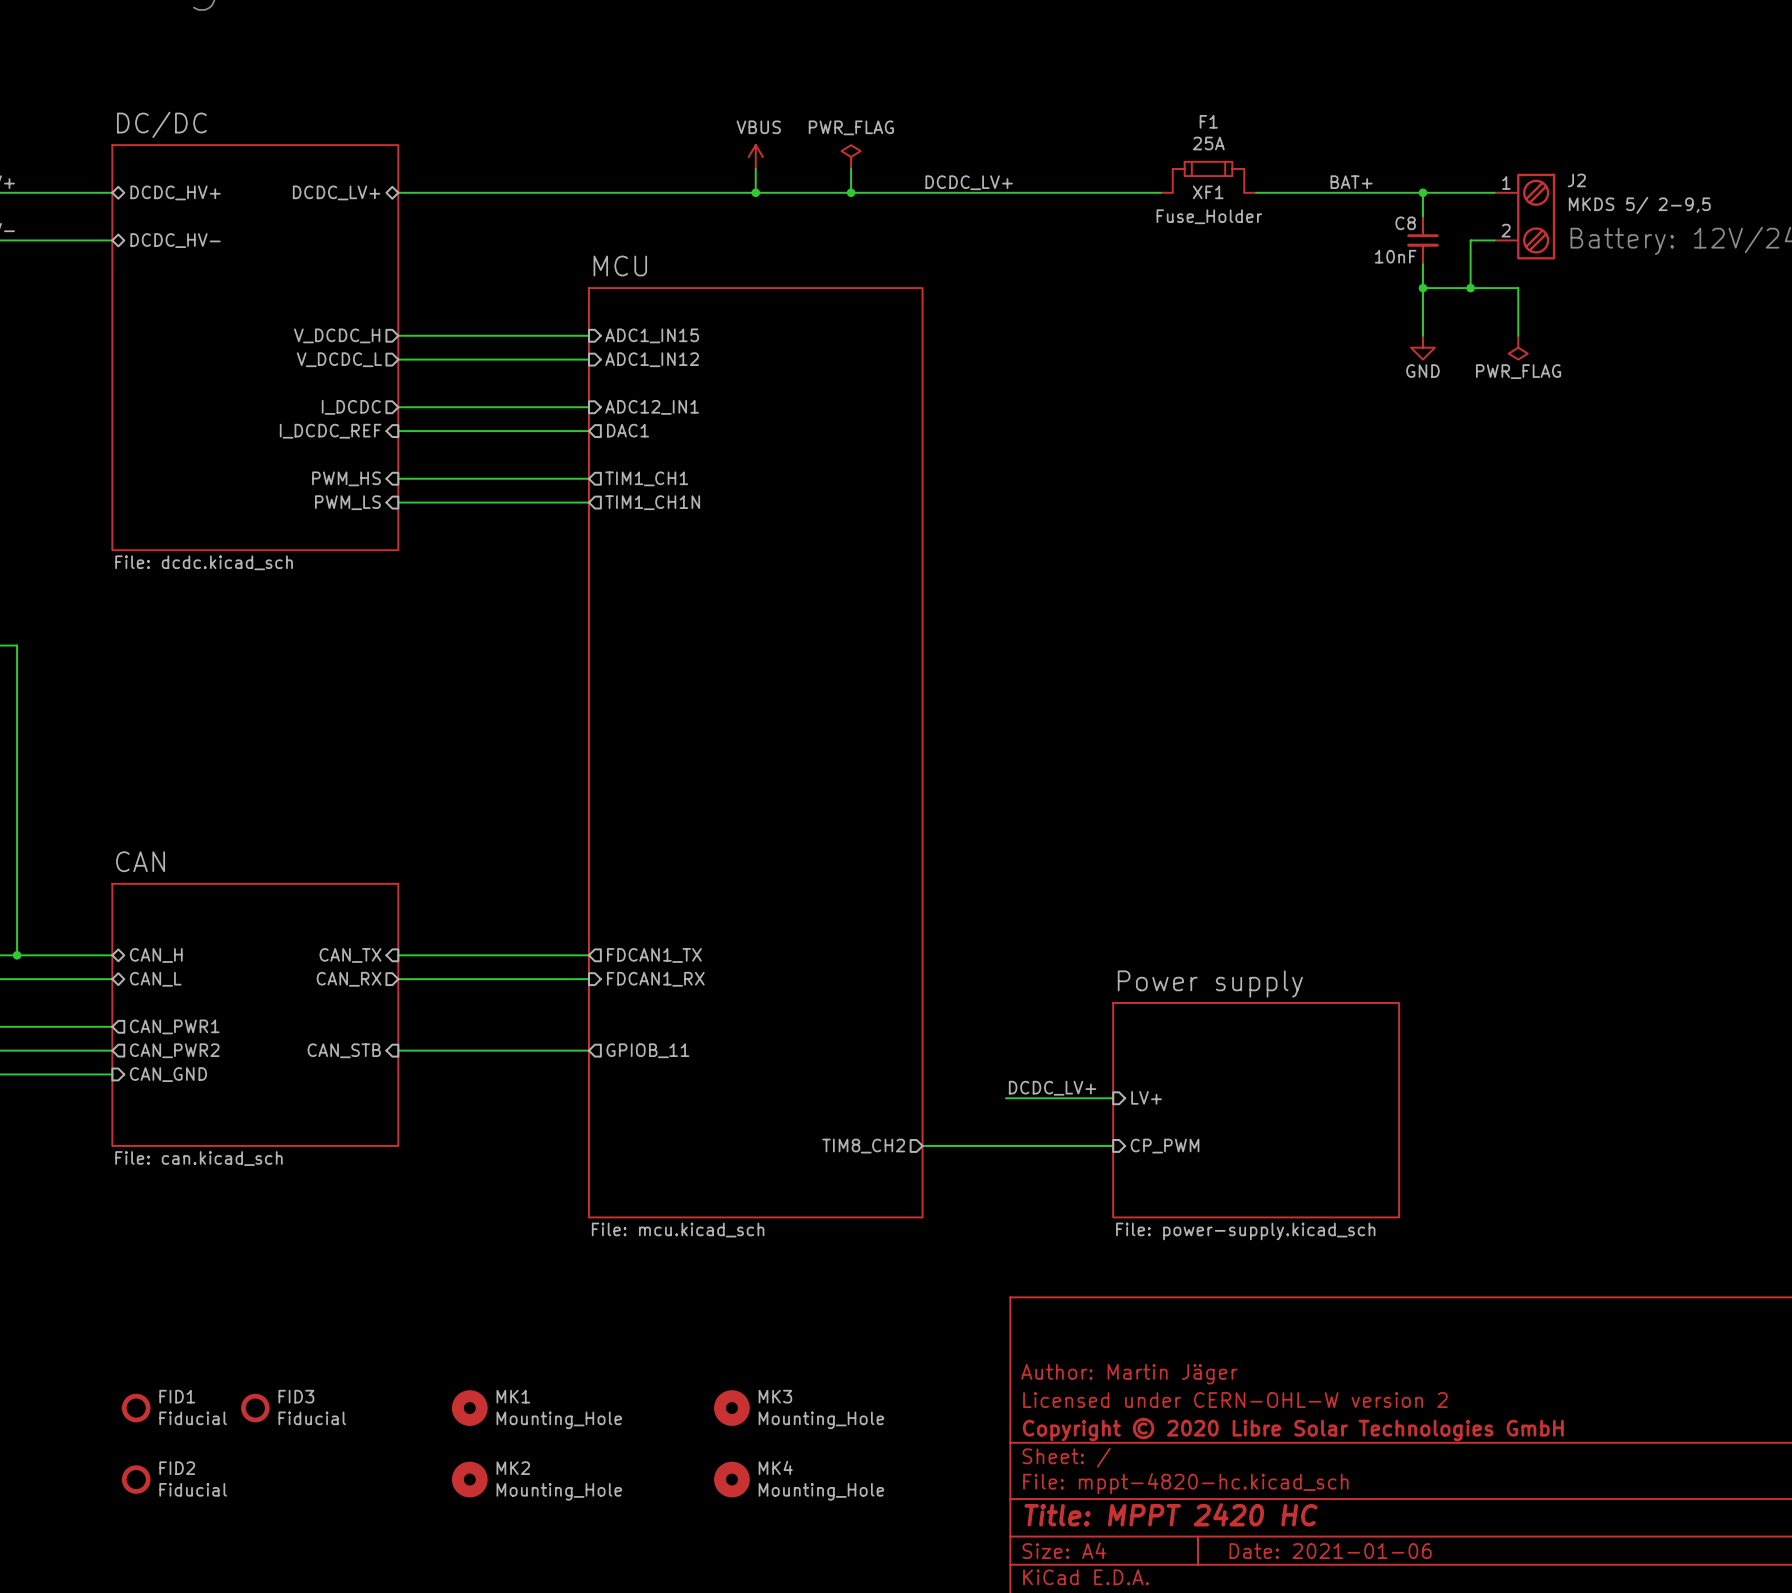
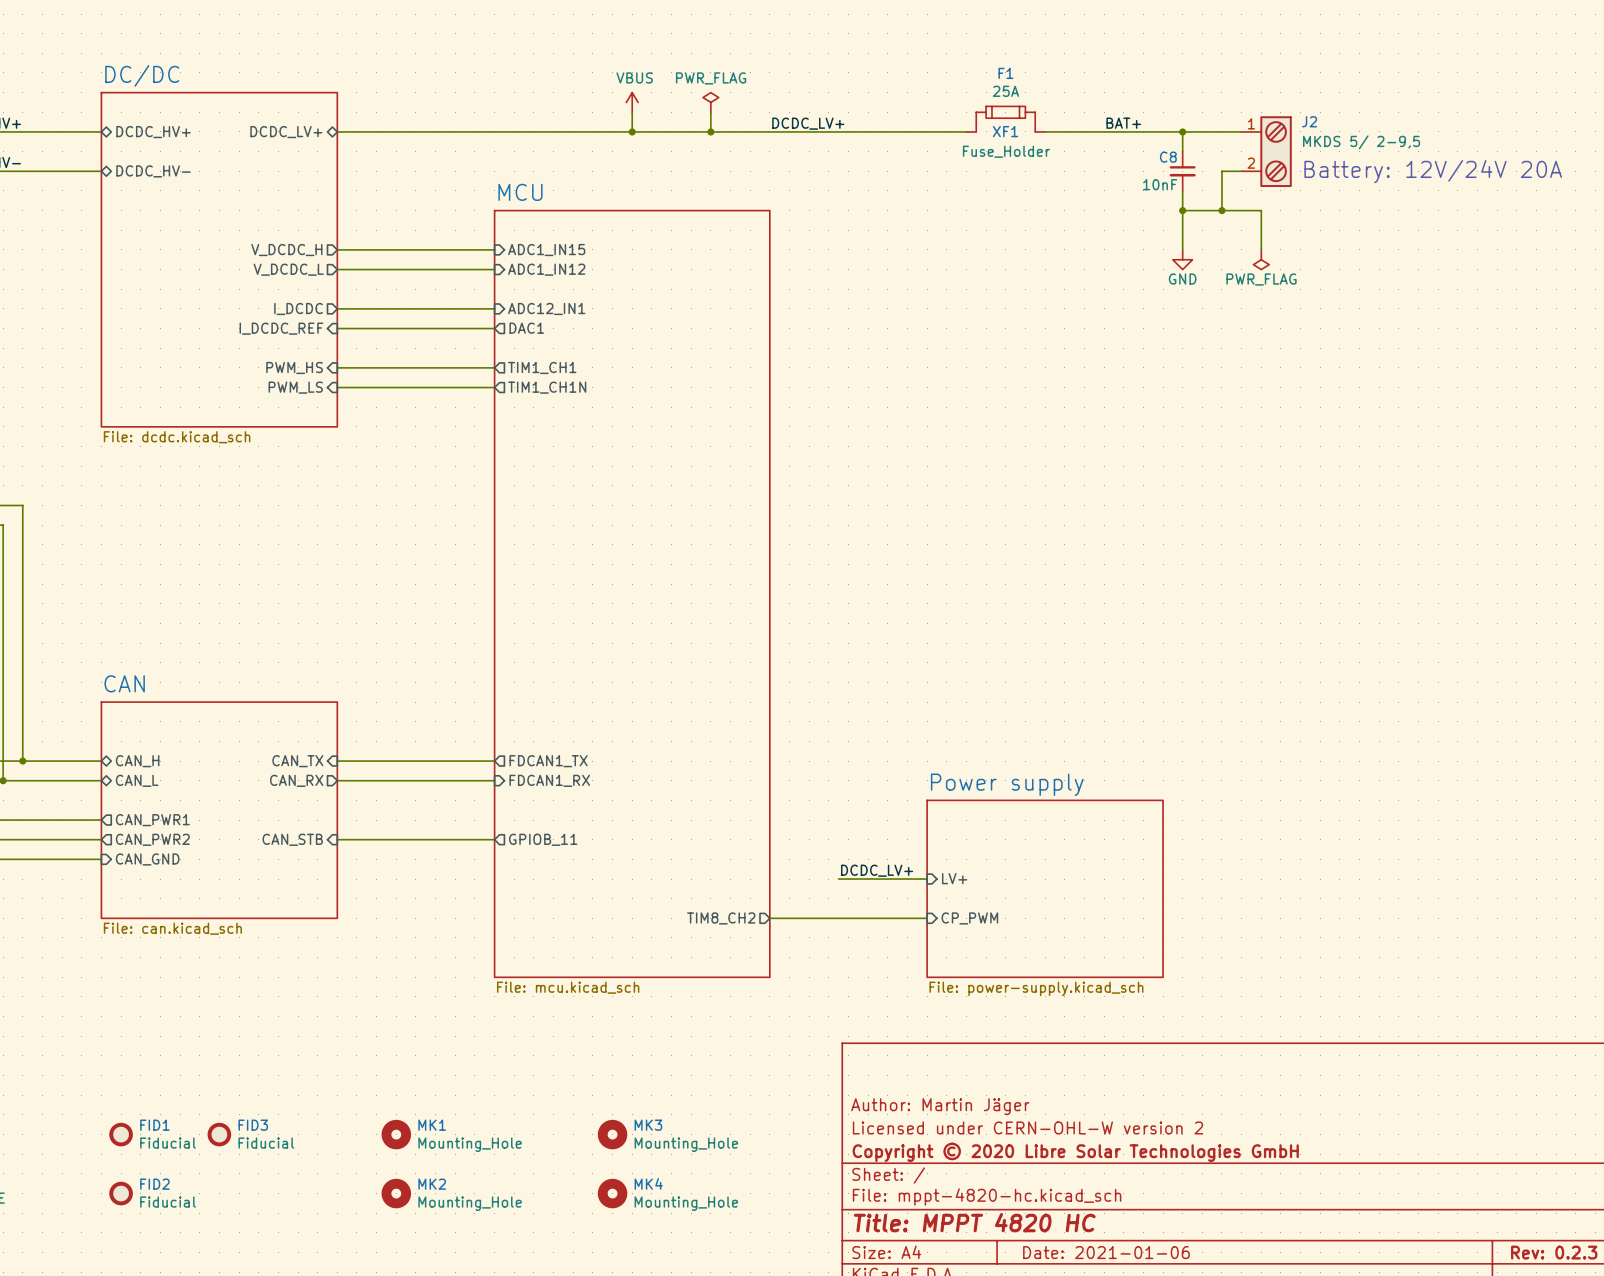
title block: Title: MPPT 2420 HC (1170, 1514) -> Title: MPPT 4820 HC (974, 1222)

